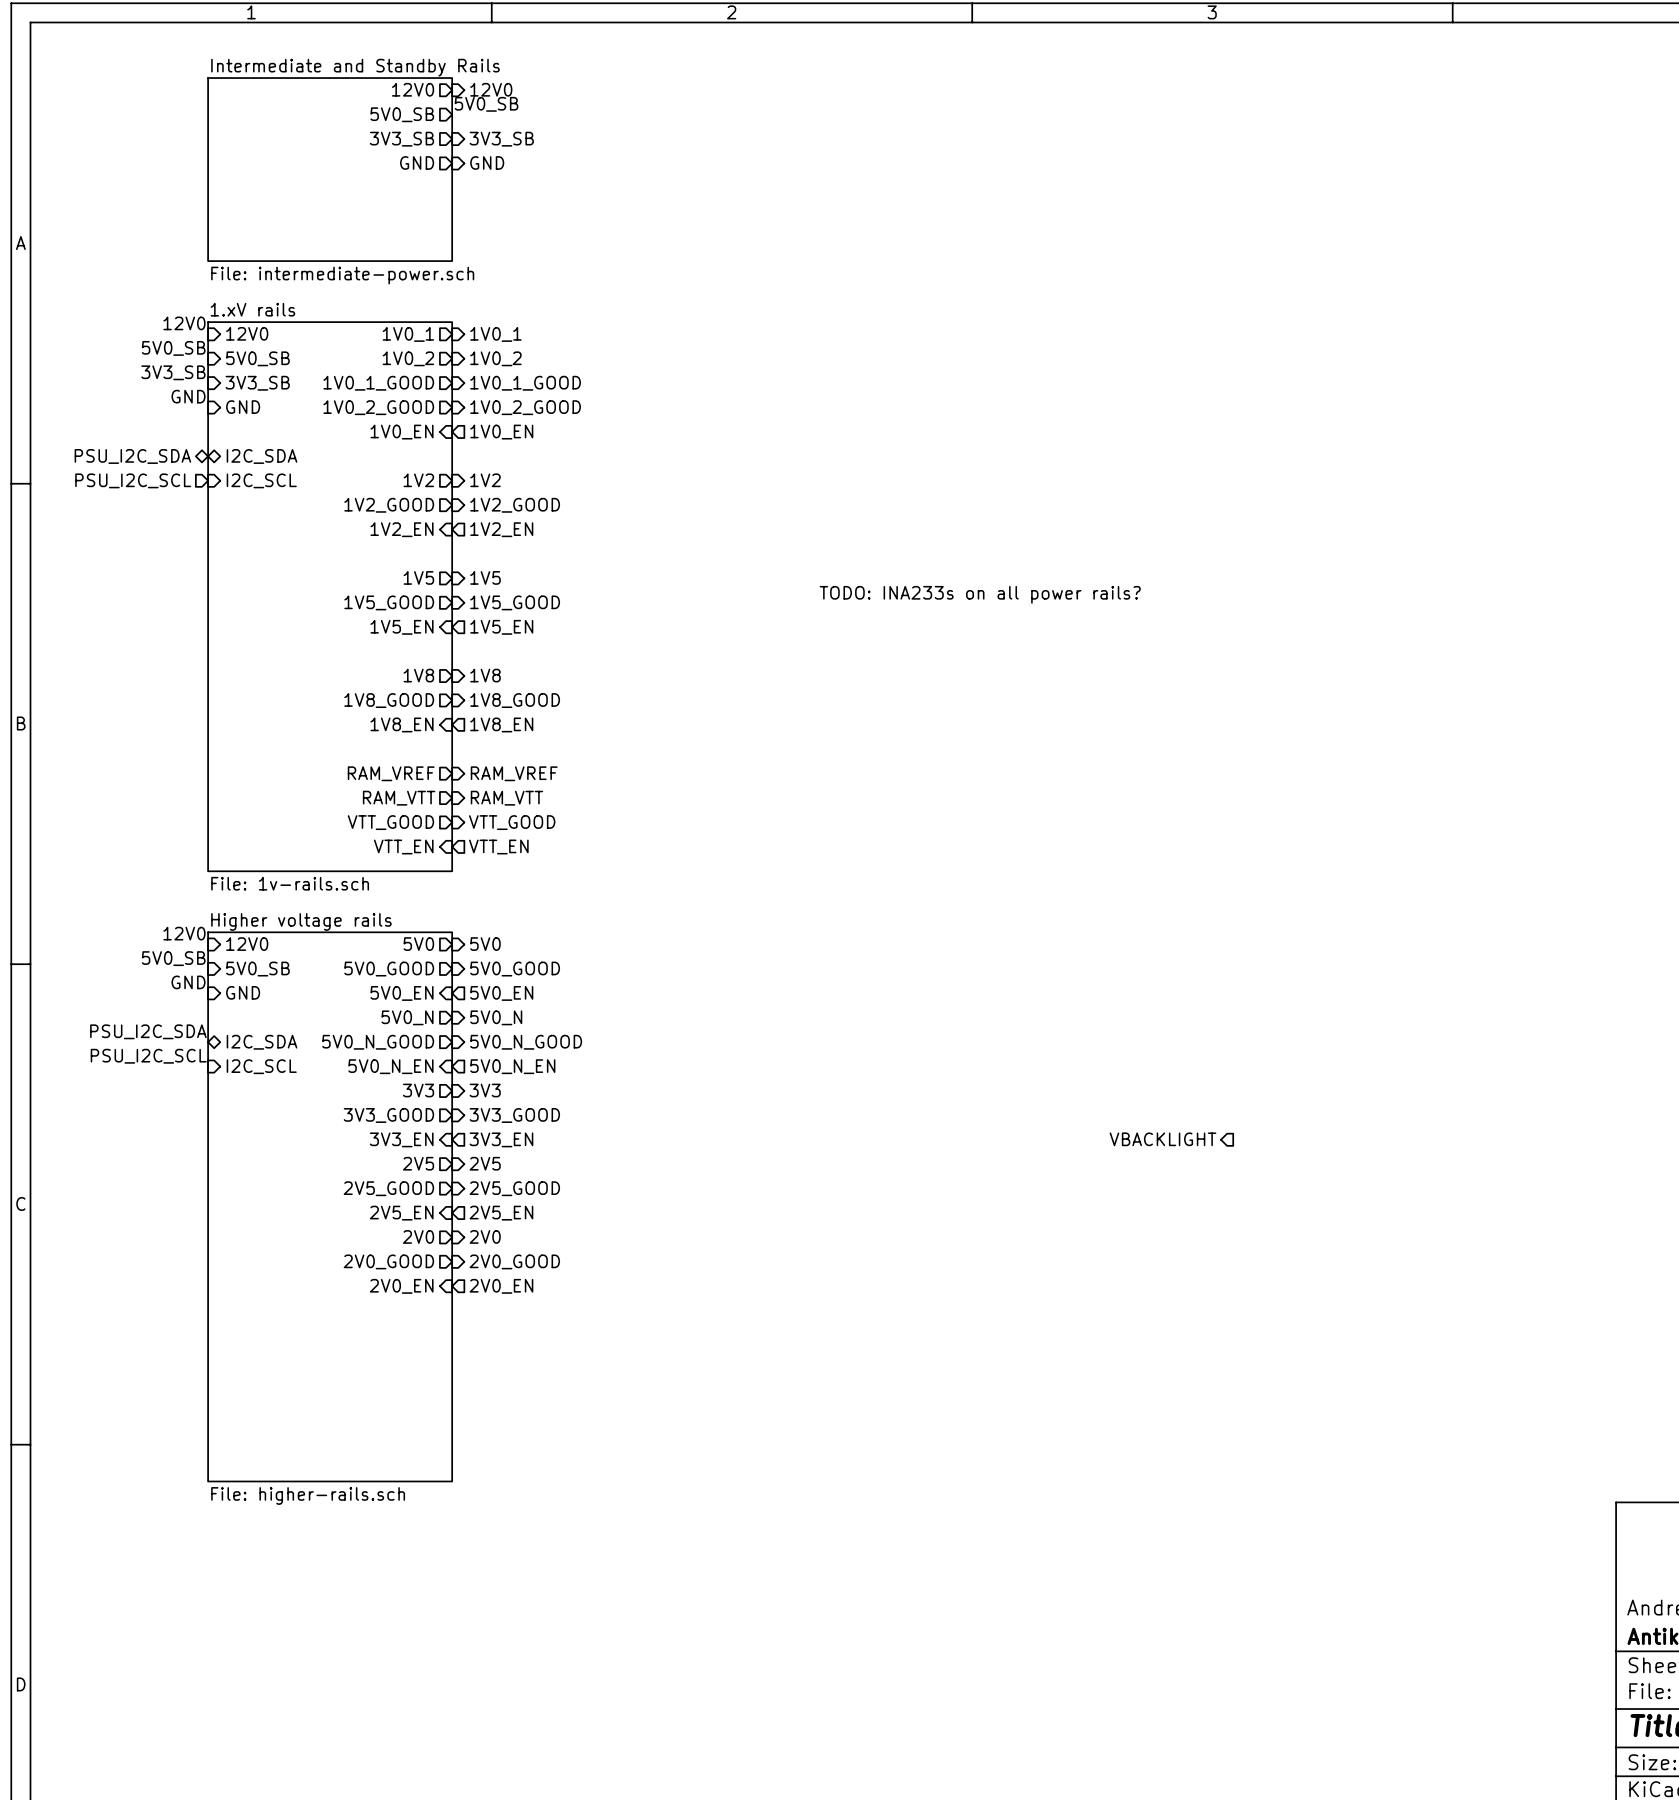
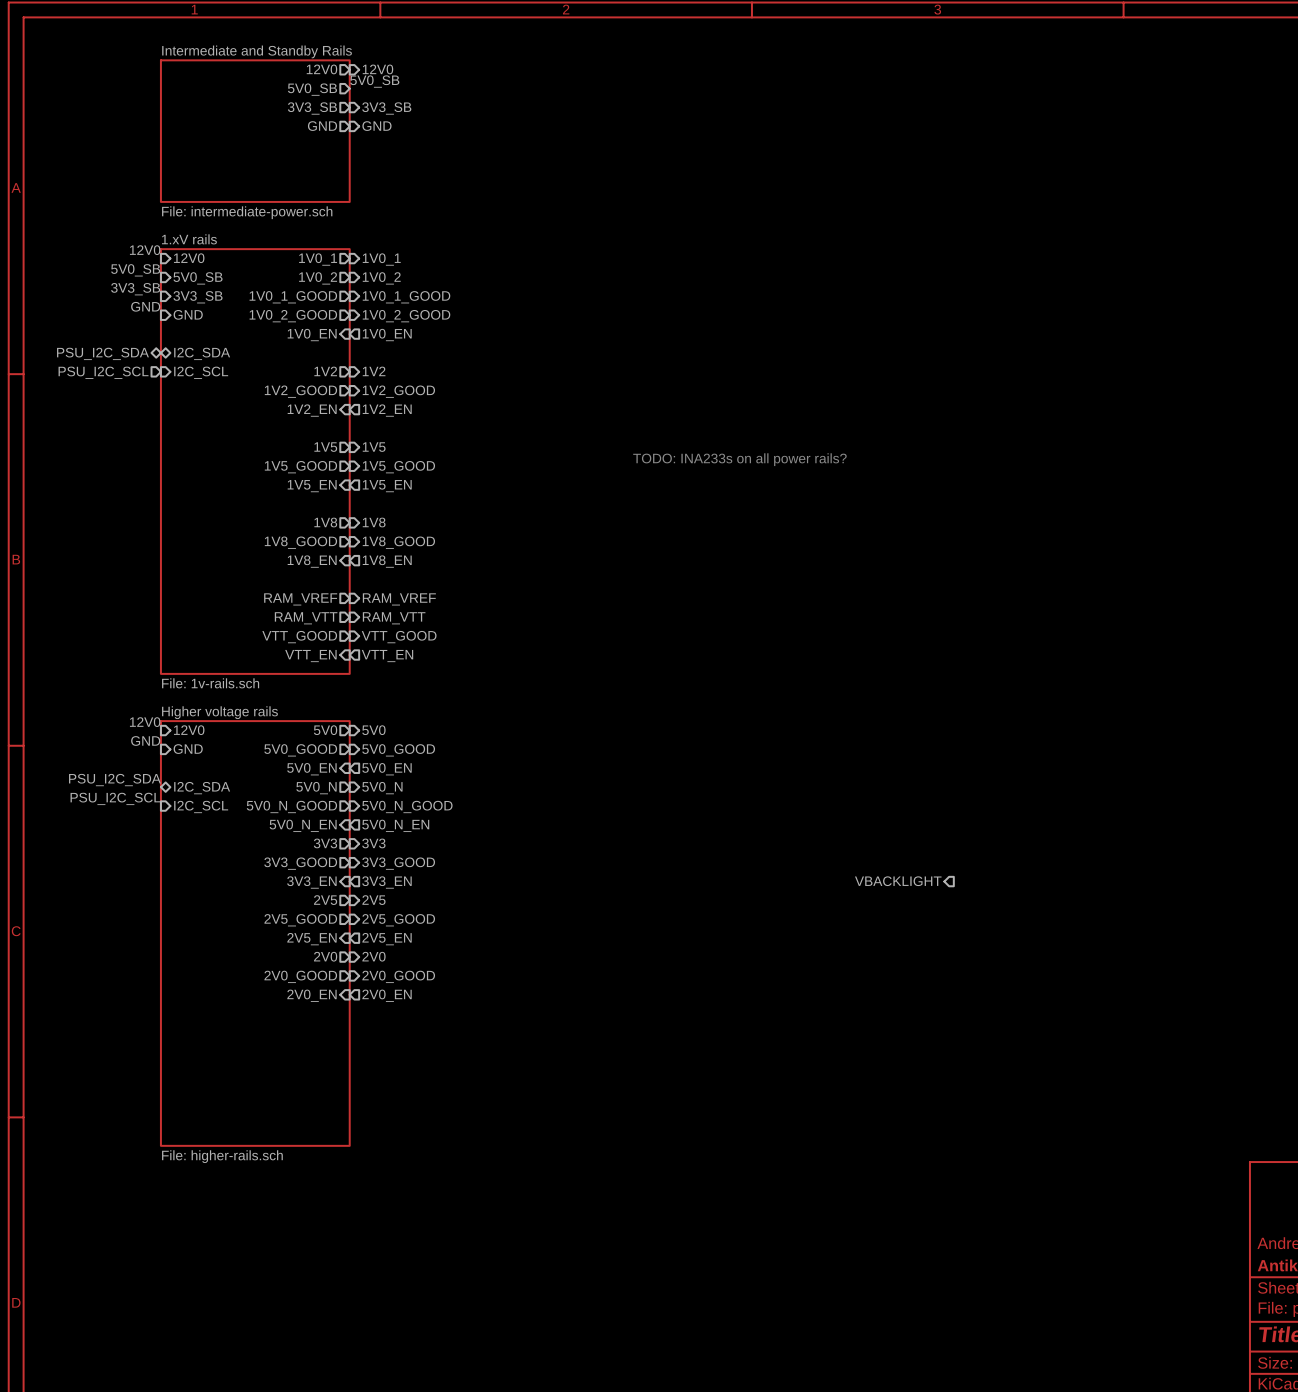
label: 5V0_SB (173, 958) -> GND (145, 740)
sheet pin: 5V0_SB (257, 969) -> GND (188, 749)
label: GND (188, 982) -> none
sheet pin: GND (243, 992) -> none
label: none -> PSU_I2C_SDA (114, 780)
sheet pin: none -> I2C_SDA (202, 788)
label: PSU_I2C_SDA (148, 1031) -> PSU_I2C_SCL (115, 798)
sheet pin shape: bidirectional (262, 1042) -> input (201, 806)
sheet pin: I2C_SDA (262, 1042) -> I2C_SCL (201, 806)
label: PSU_I2C_SCL (148, 1056) -> none
sheet pin: I2C_SCL (261, 1066) -> none

